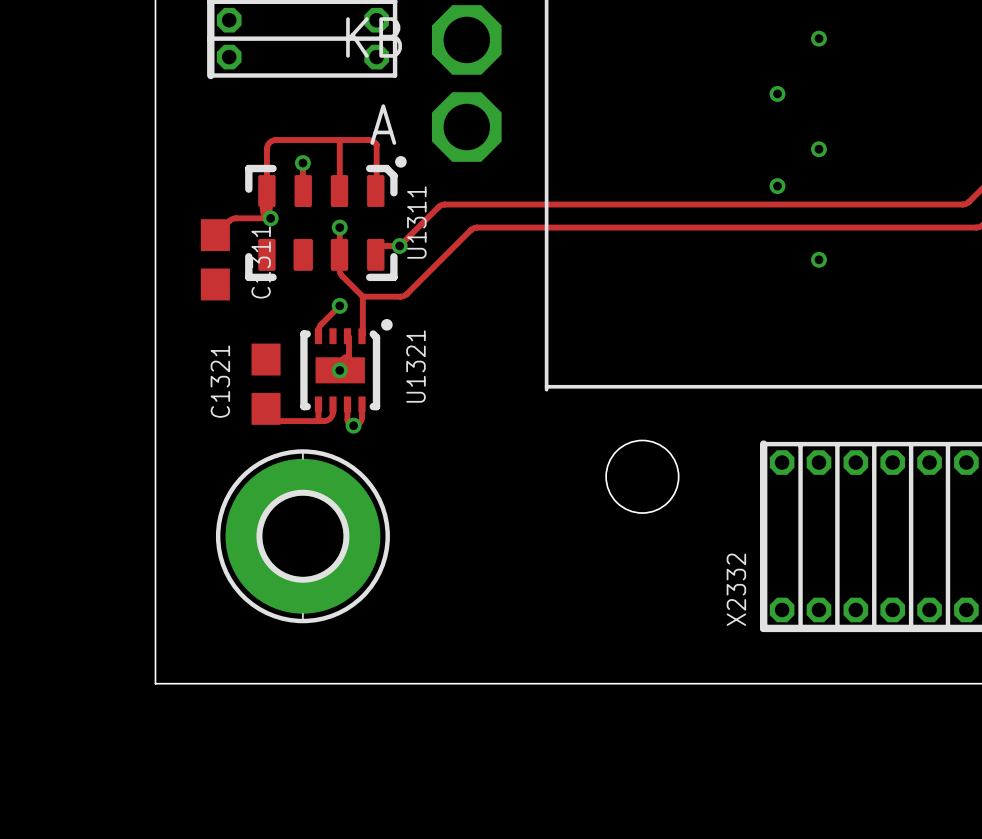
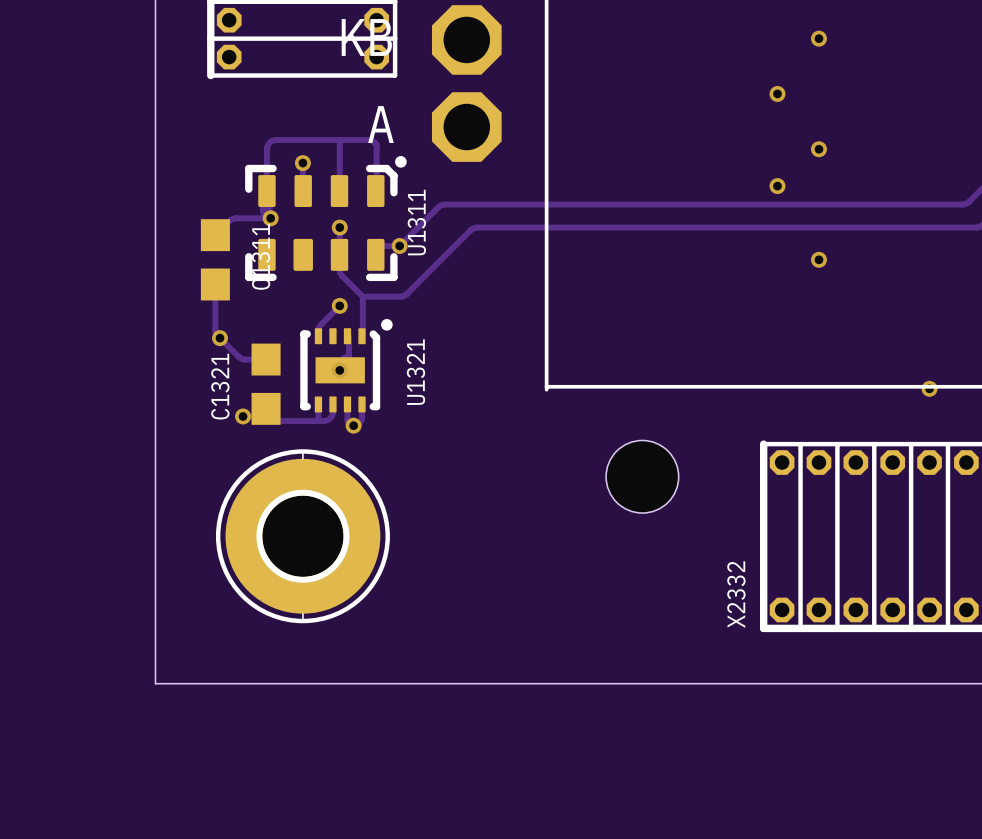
track: none -> (215, 284) (215, 329) (217, 335) (240, 358) (266, 359)
via: none -> (219, 338)
via: none -> (929, 388)
via: none -> (243, 416)

